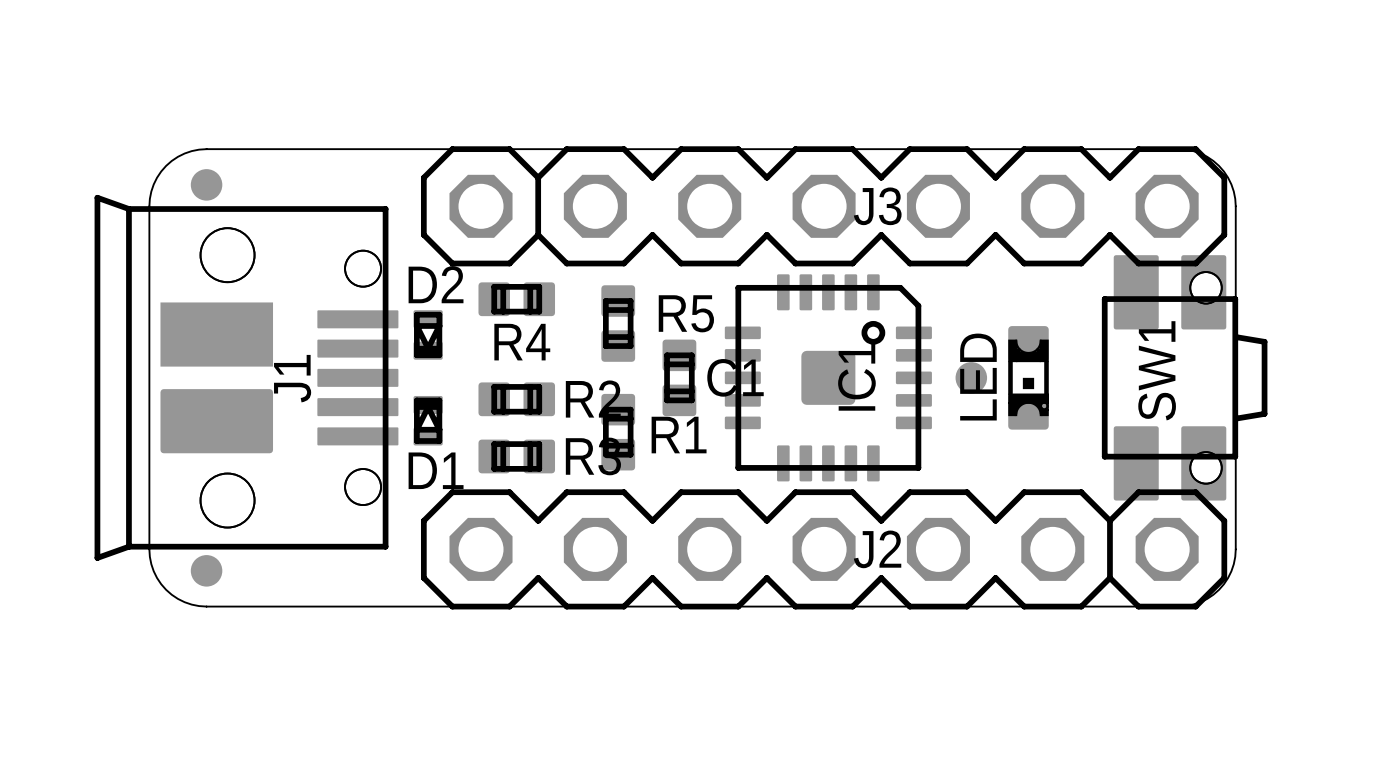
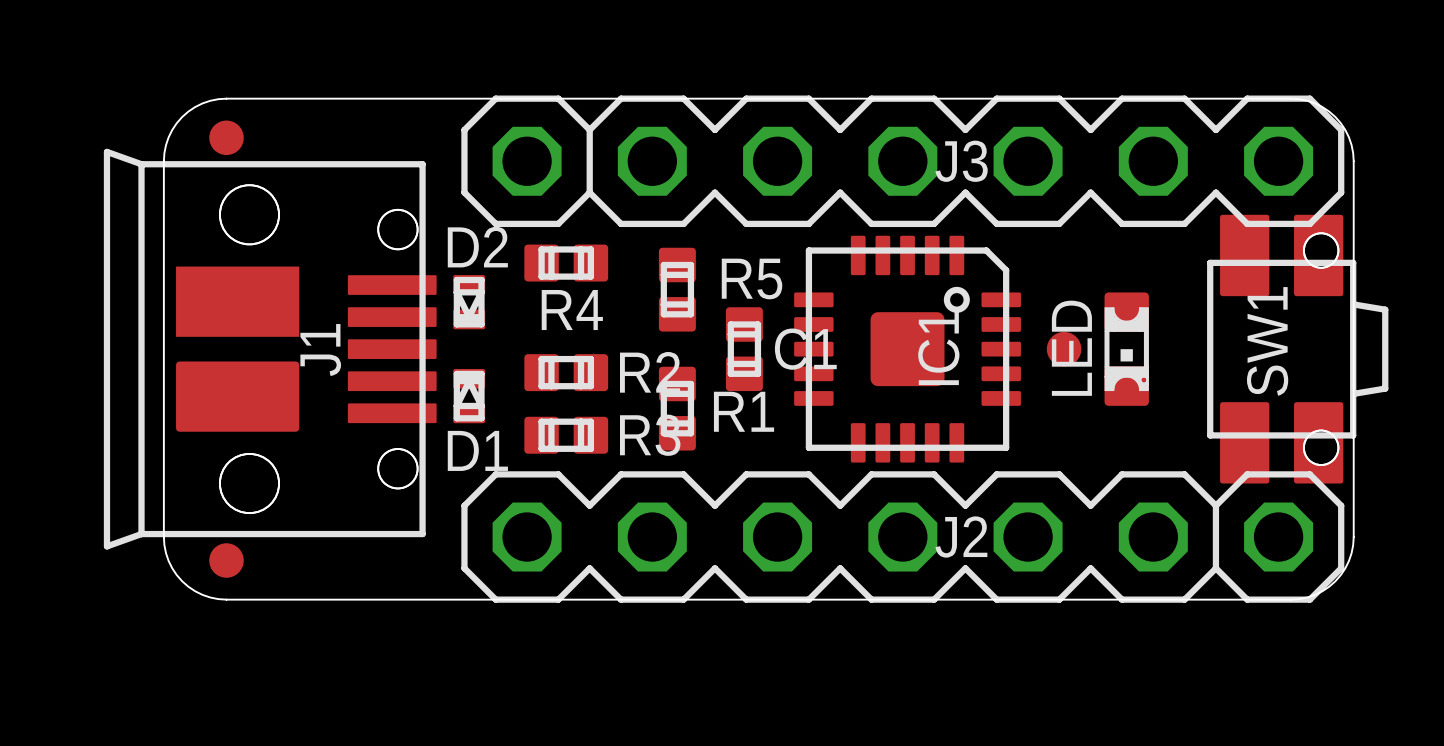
IC1 footprint: [724, 274, 932, 482] -> [794, 235, 1021, 463]

